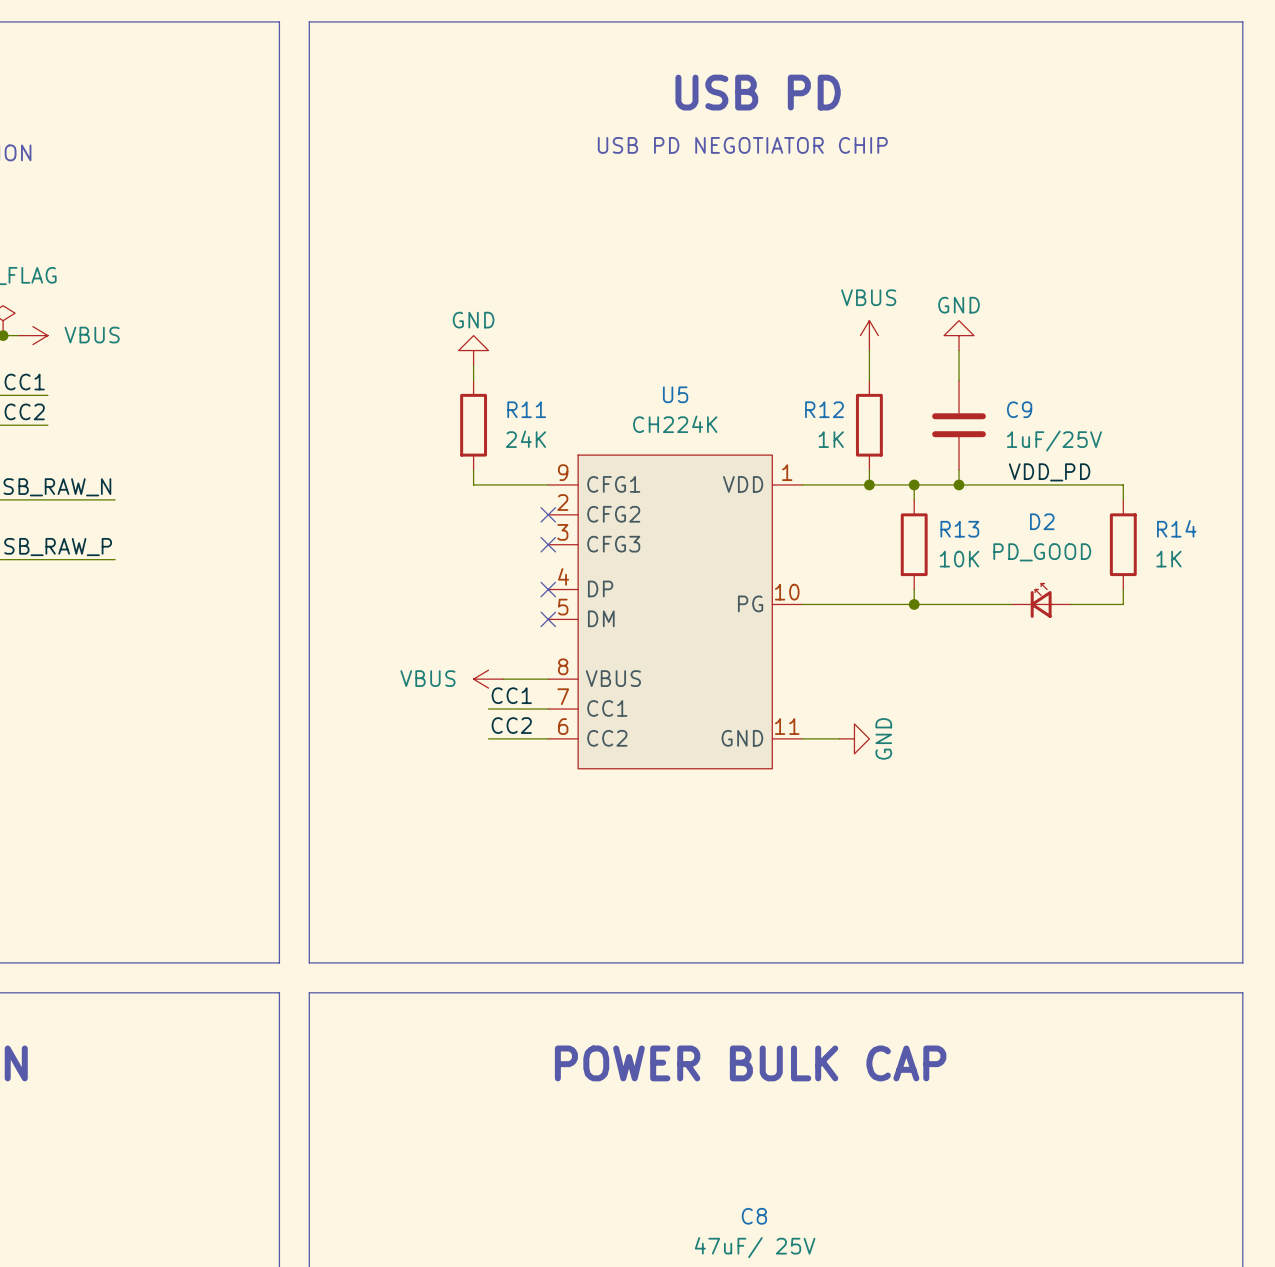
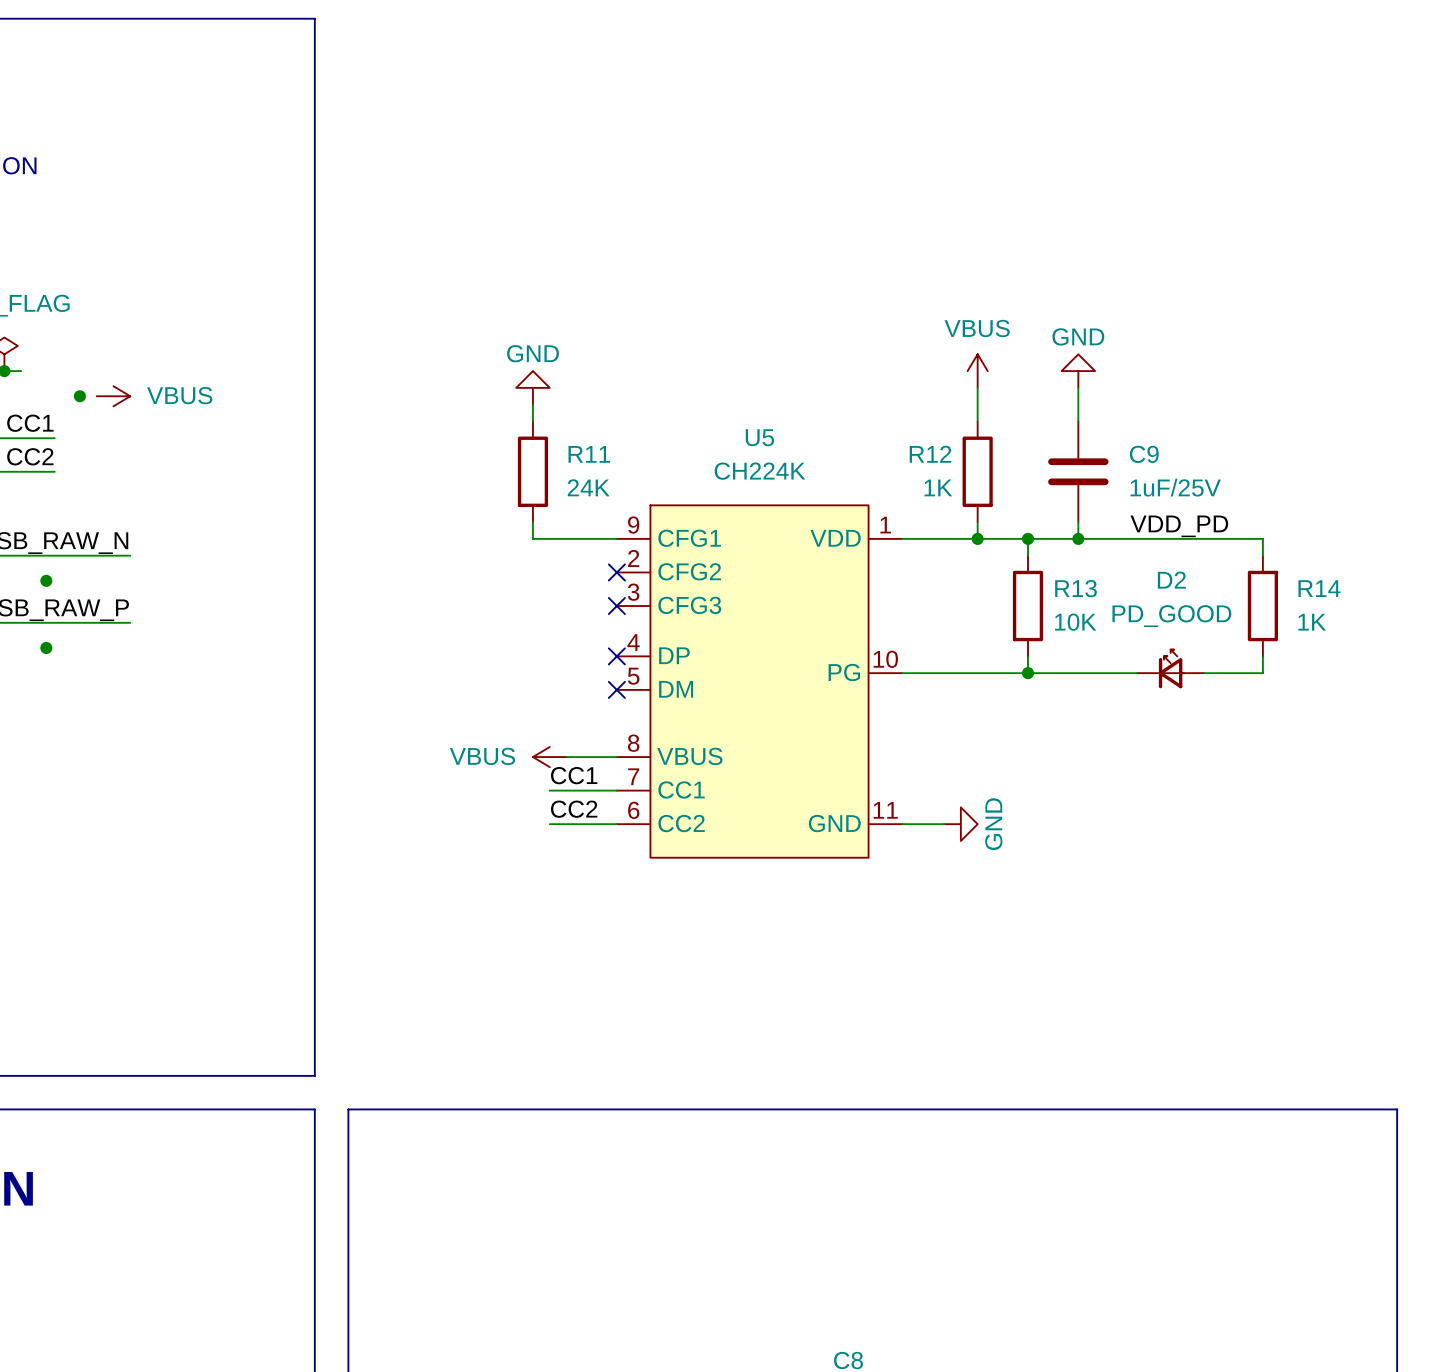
line: (309, 21) (1242, 21) (1242, 962) (309, 962) (309, 21) -> none
text: USB PD (758, 92) -> none
text: USB PD NEGOTIATOR CHIP (742, 145) -> none
power symbol position: VBUS (32, 335) -> VBUS (113, 396)
junction: none -> (79, 396)
junction: none -> (46, 580)
junction: none -> (46, 647)
text: POWER BULK CAP (750, 1063) -> none

